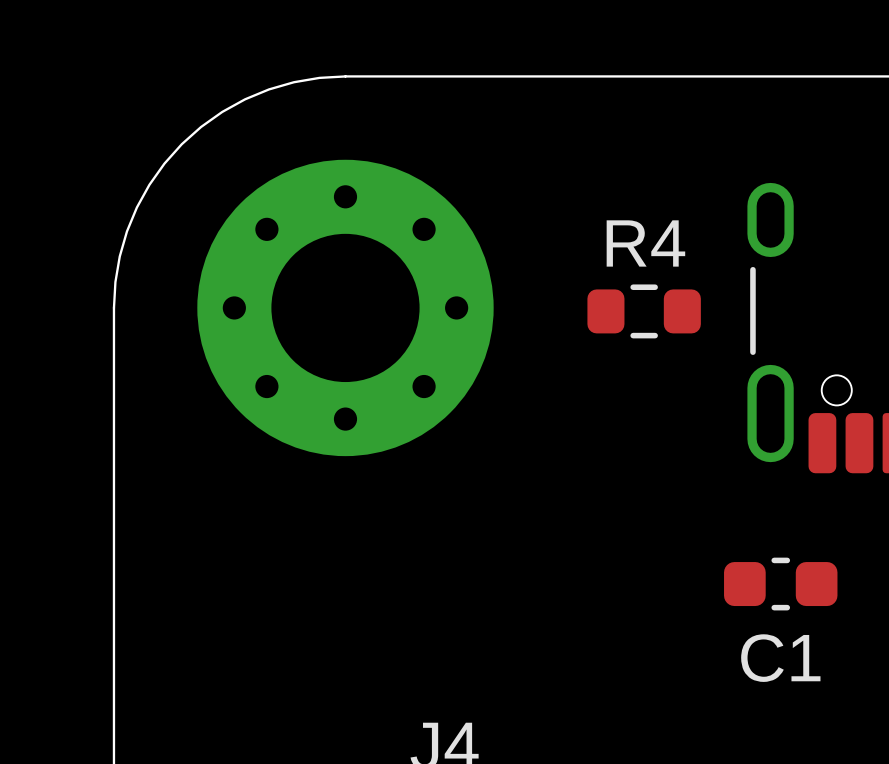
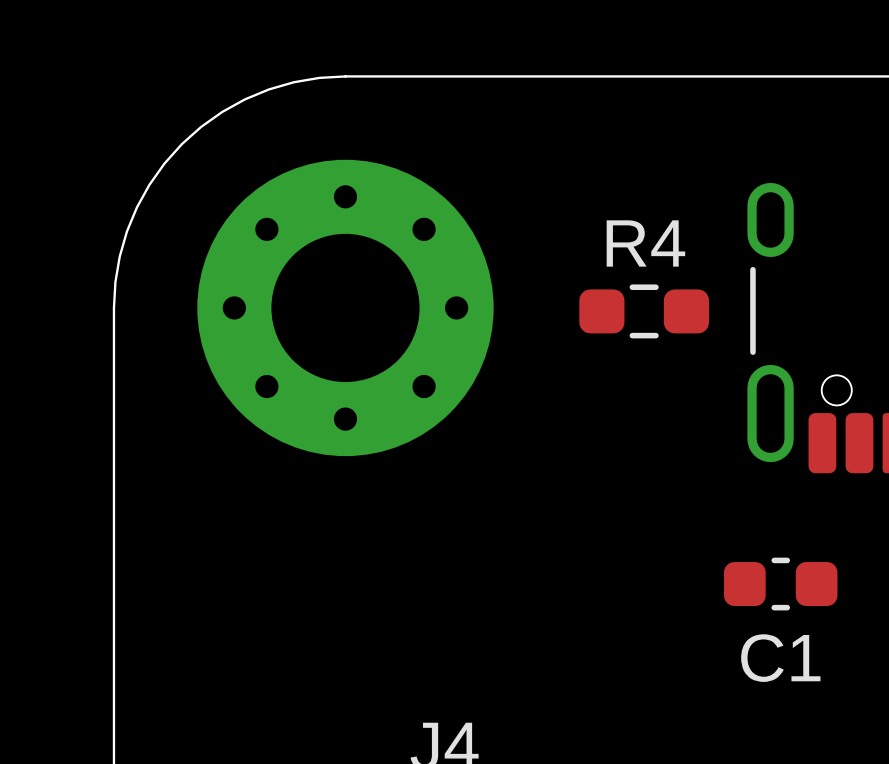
R4 footprint: [587, 284, 701, 339] -> [579, 284, 709, 339]

